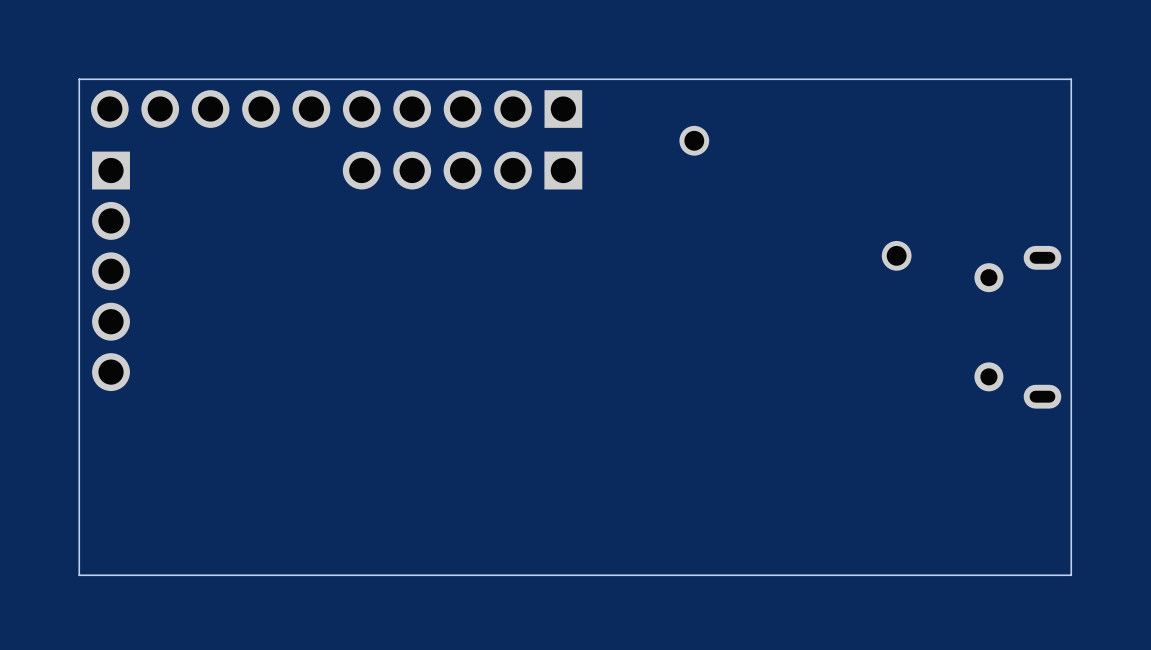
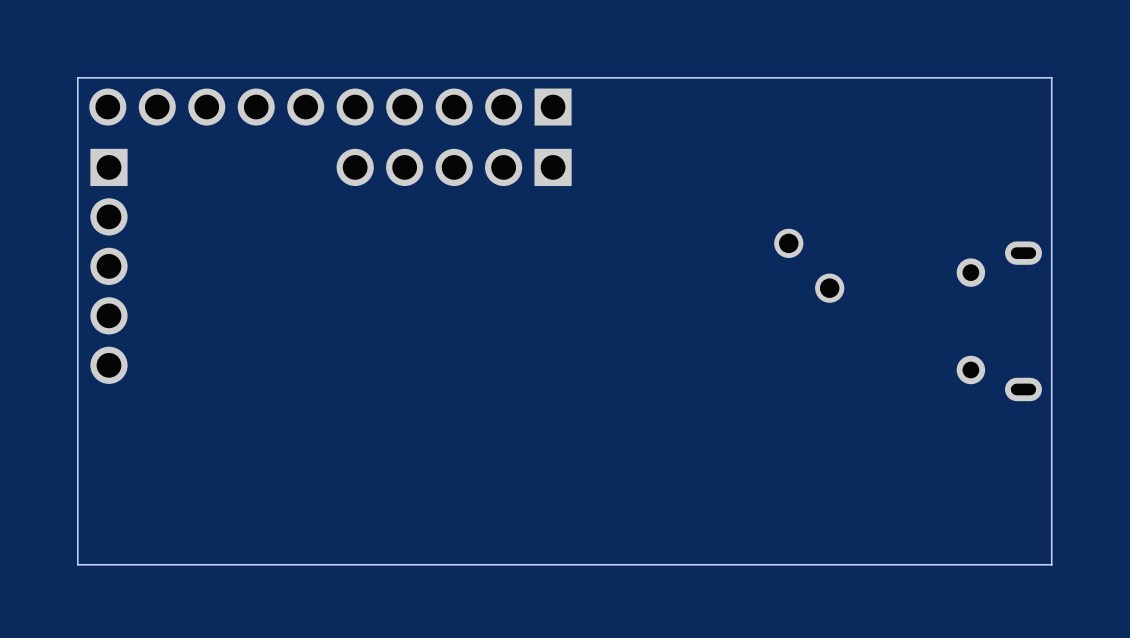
part: (694, 140) -> none
part: none -> (788, 243)
part: (896, 255) -> none
part: none -> (829, 288)

